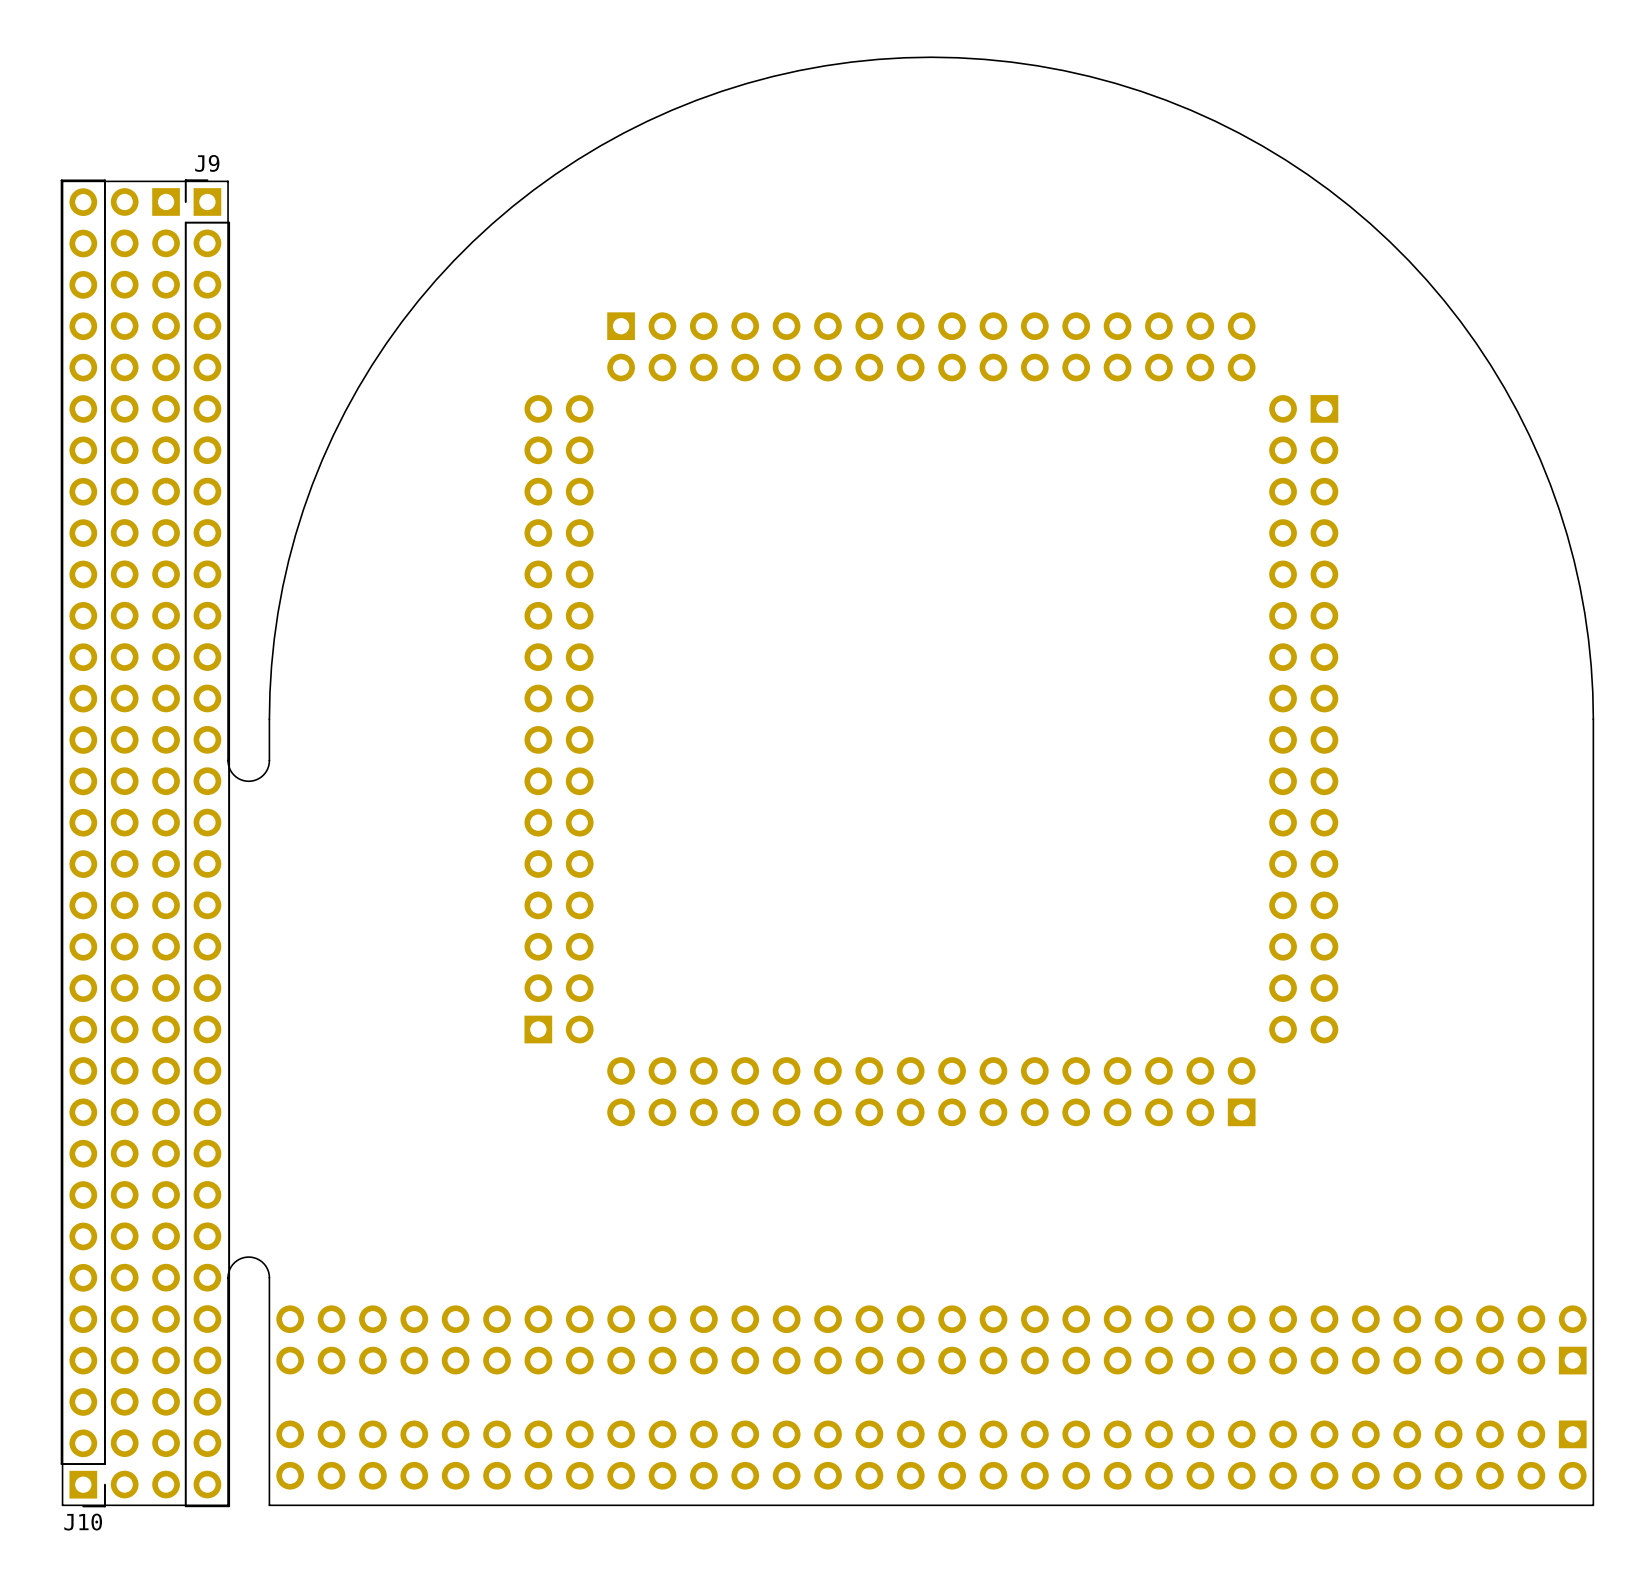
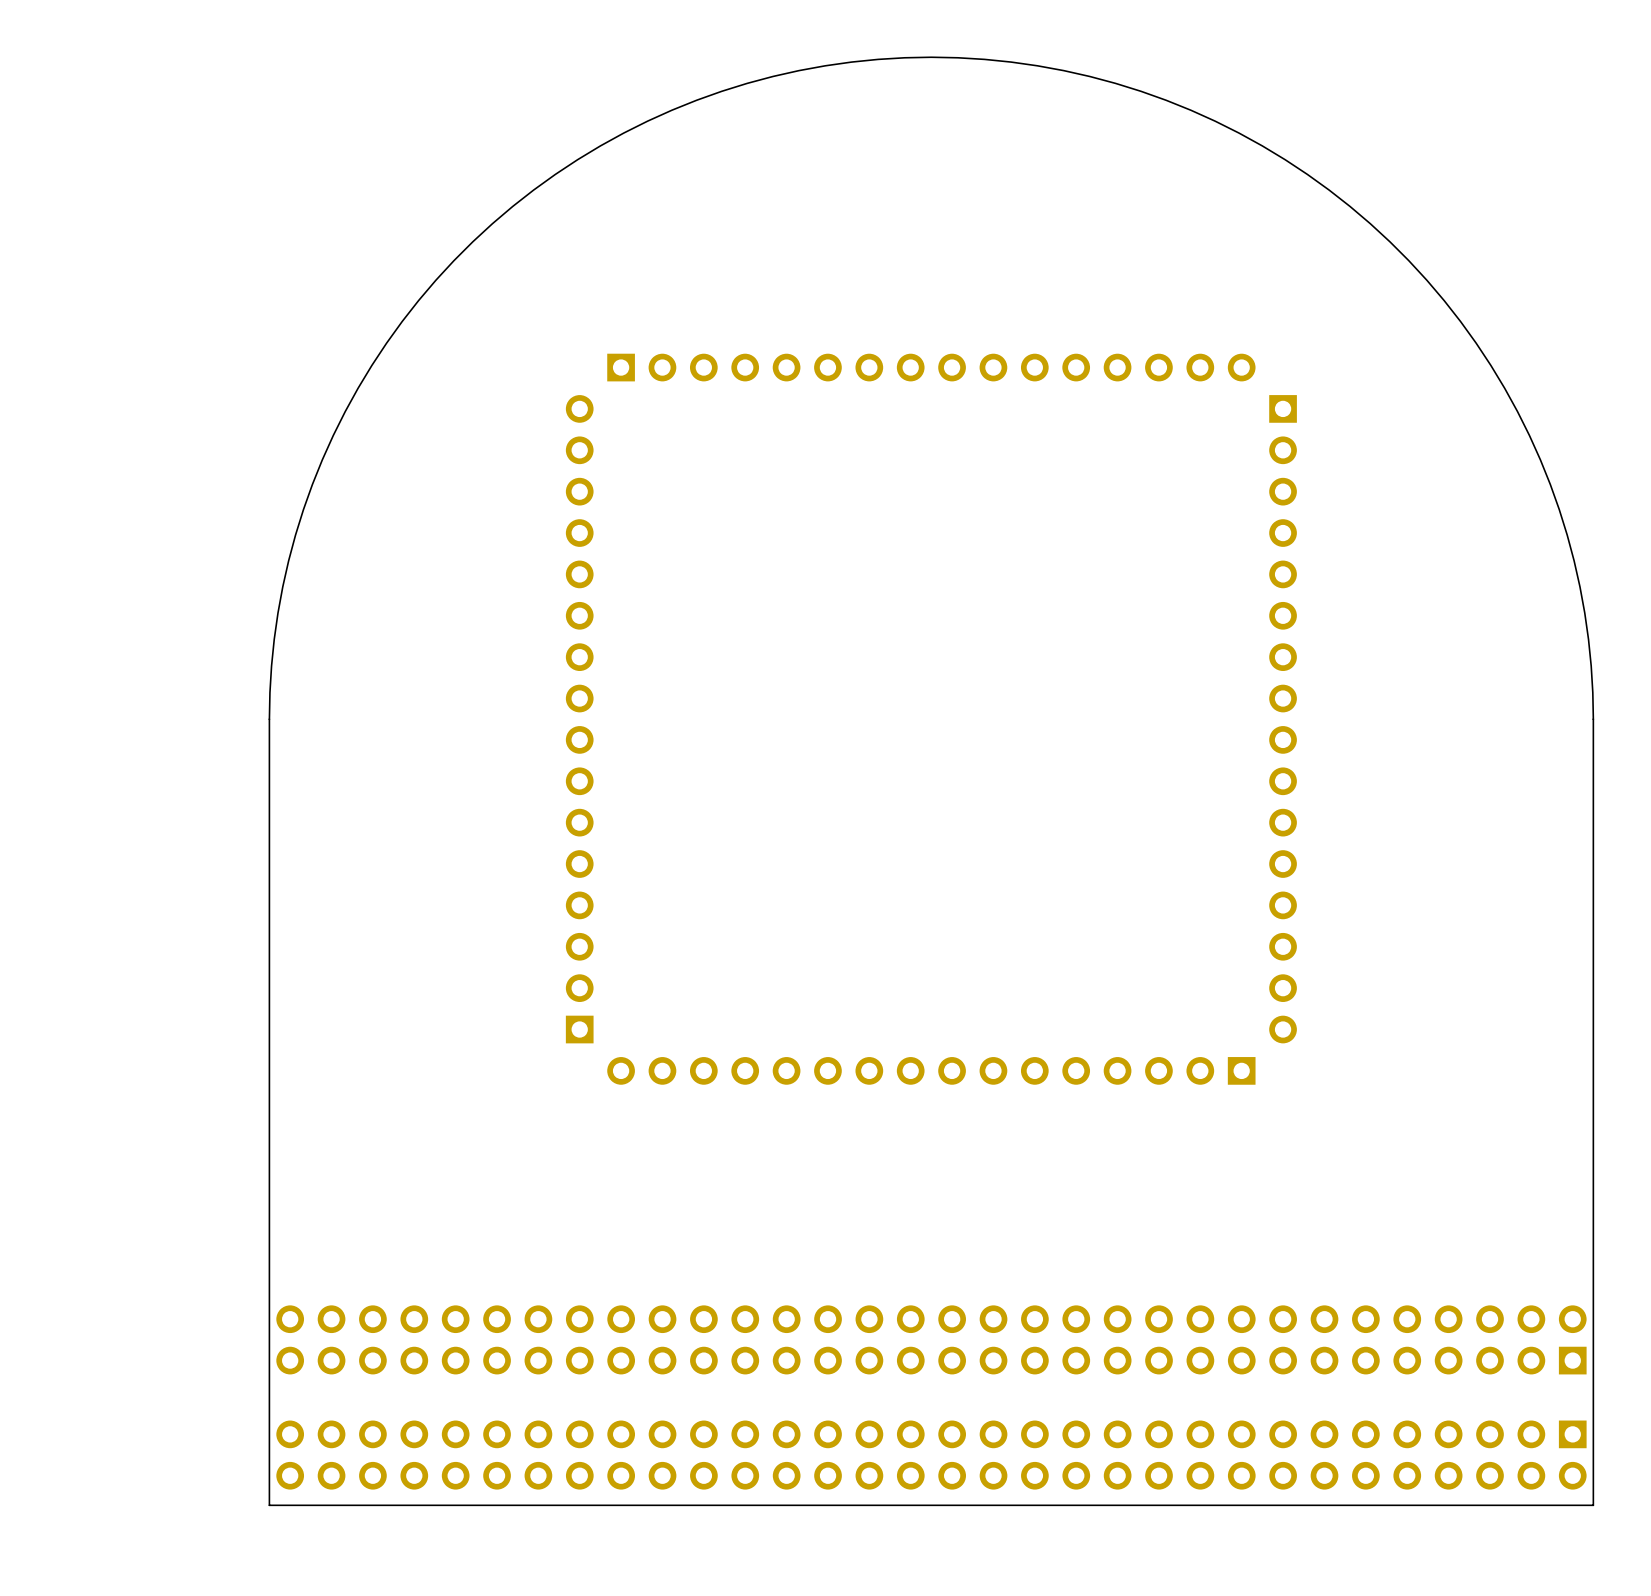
part: (931, 346) -> none
part: none -> (931, 367)
part: (559, 719) -> none
part: none -> (579, 719)
part: none -> (1283, 719)
part: (1303, 719) -> none
board edge: (269, 760) (267, 768) (263, 775) (256, 779) (248, 781) (240, 779) (234, 775) (228, 763) (228, 181) (62, 181) (62, 1505) (228, 1505) (228, 1275) (235, 1262) (248, 1257) (262, 1262) (267, 1268) (269, 1277) -> (269, 760) (269, 1277)
J10: (83, 843) -> none
part: (145, 843) -> none
J9: (207, 843) -> none
part: none -> (931, 1070)
part: (931, 1091) -> none

